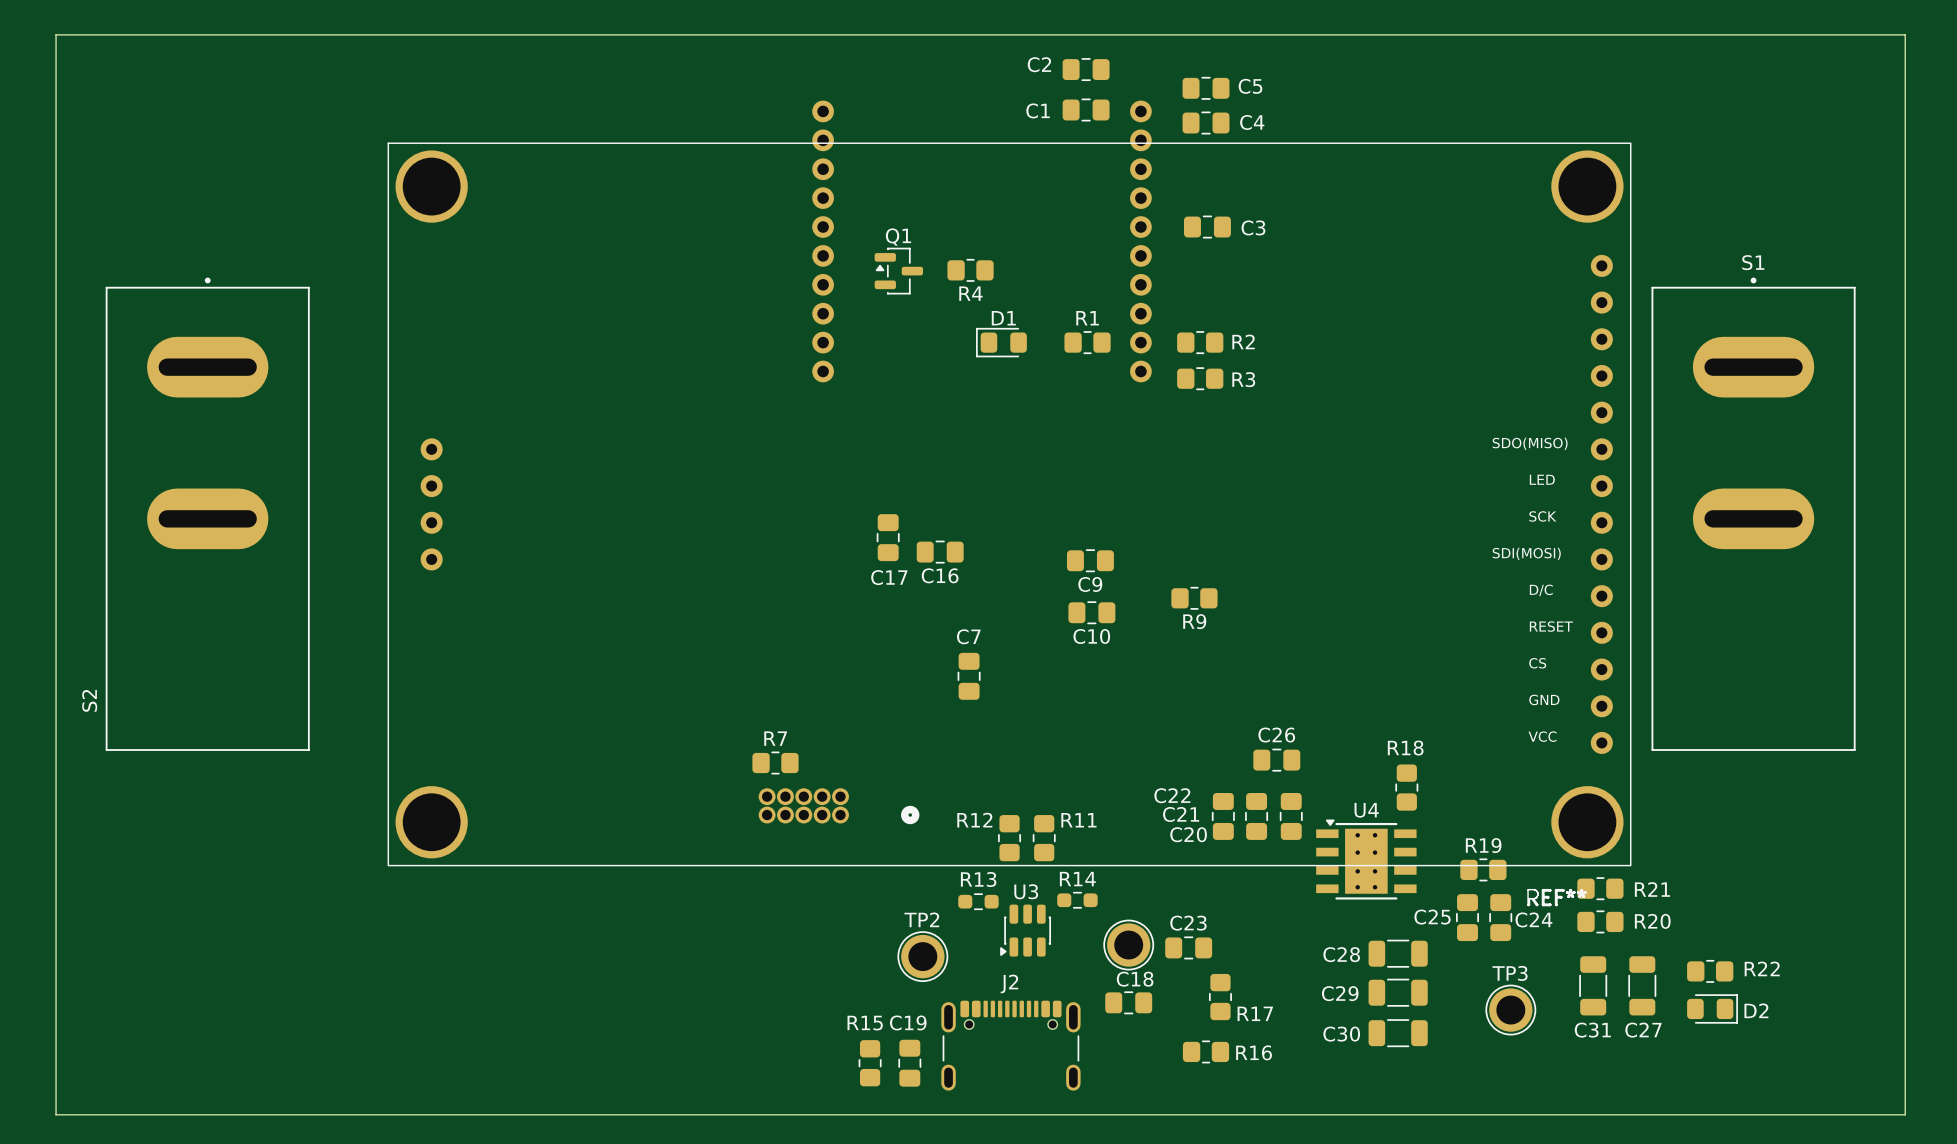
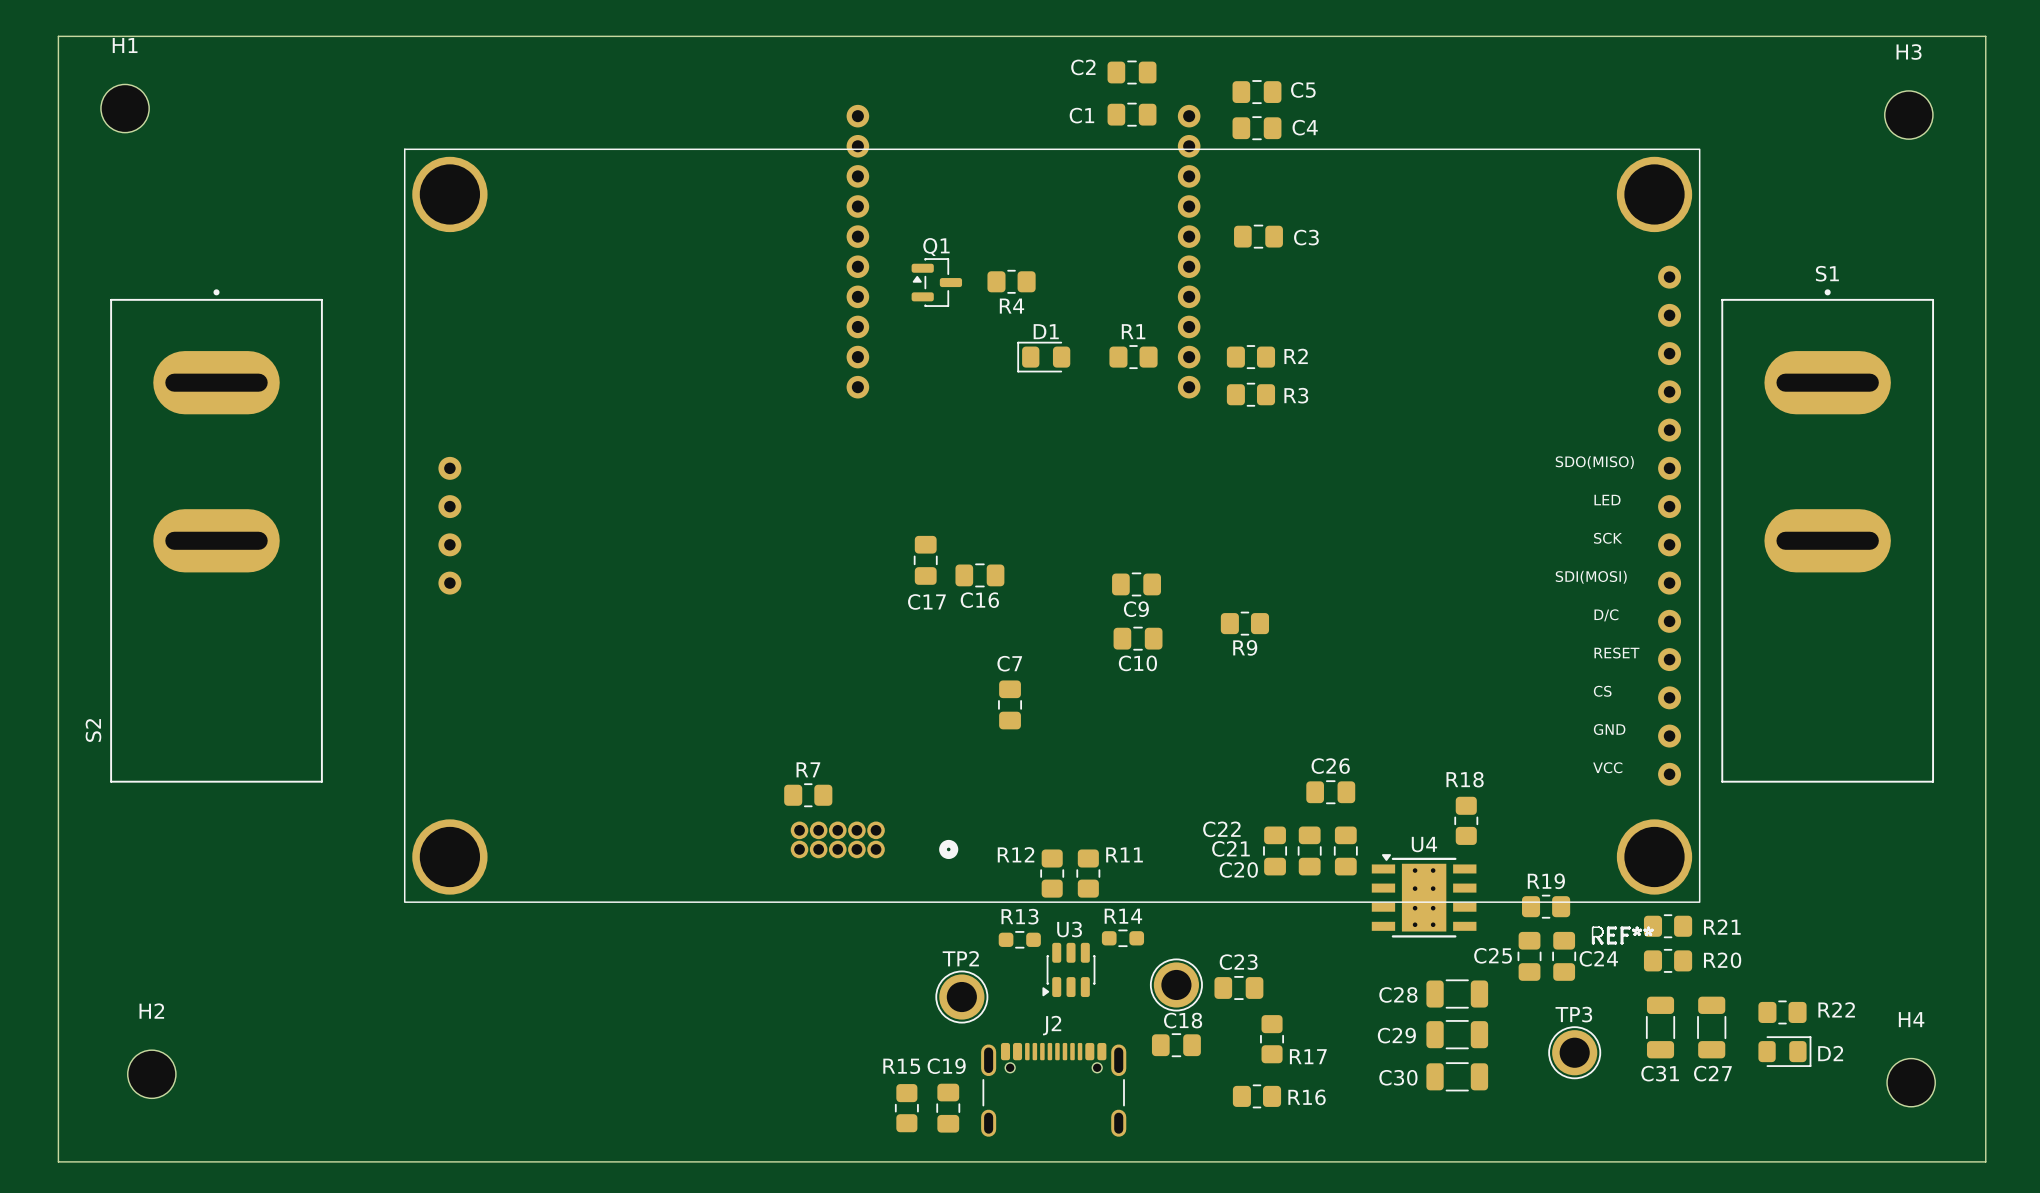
H1: none -> (125, 108)
H3: none -> (1908, 115)
H2: none -> (151, 1074)
H4: none -> (1911, 1082)

